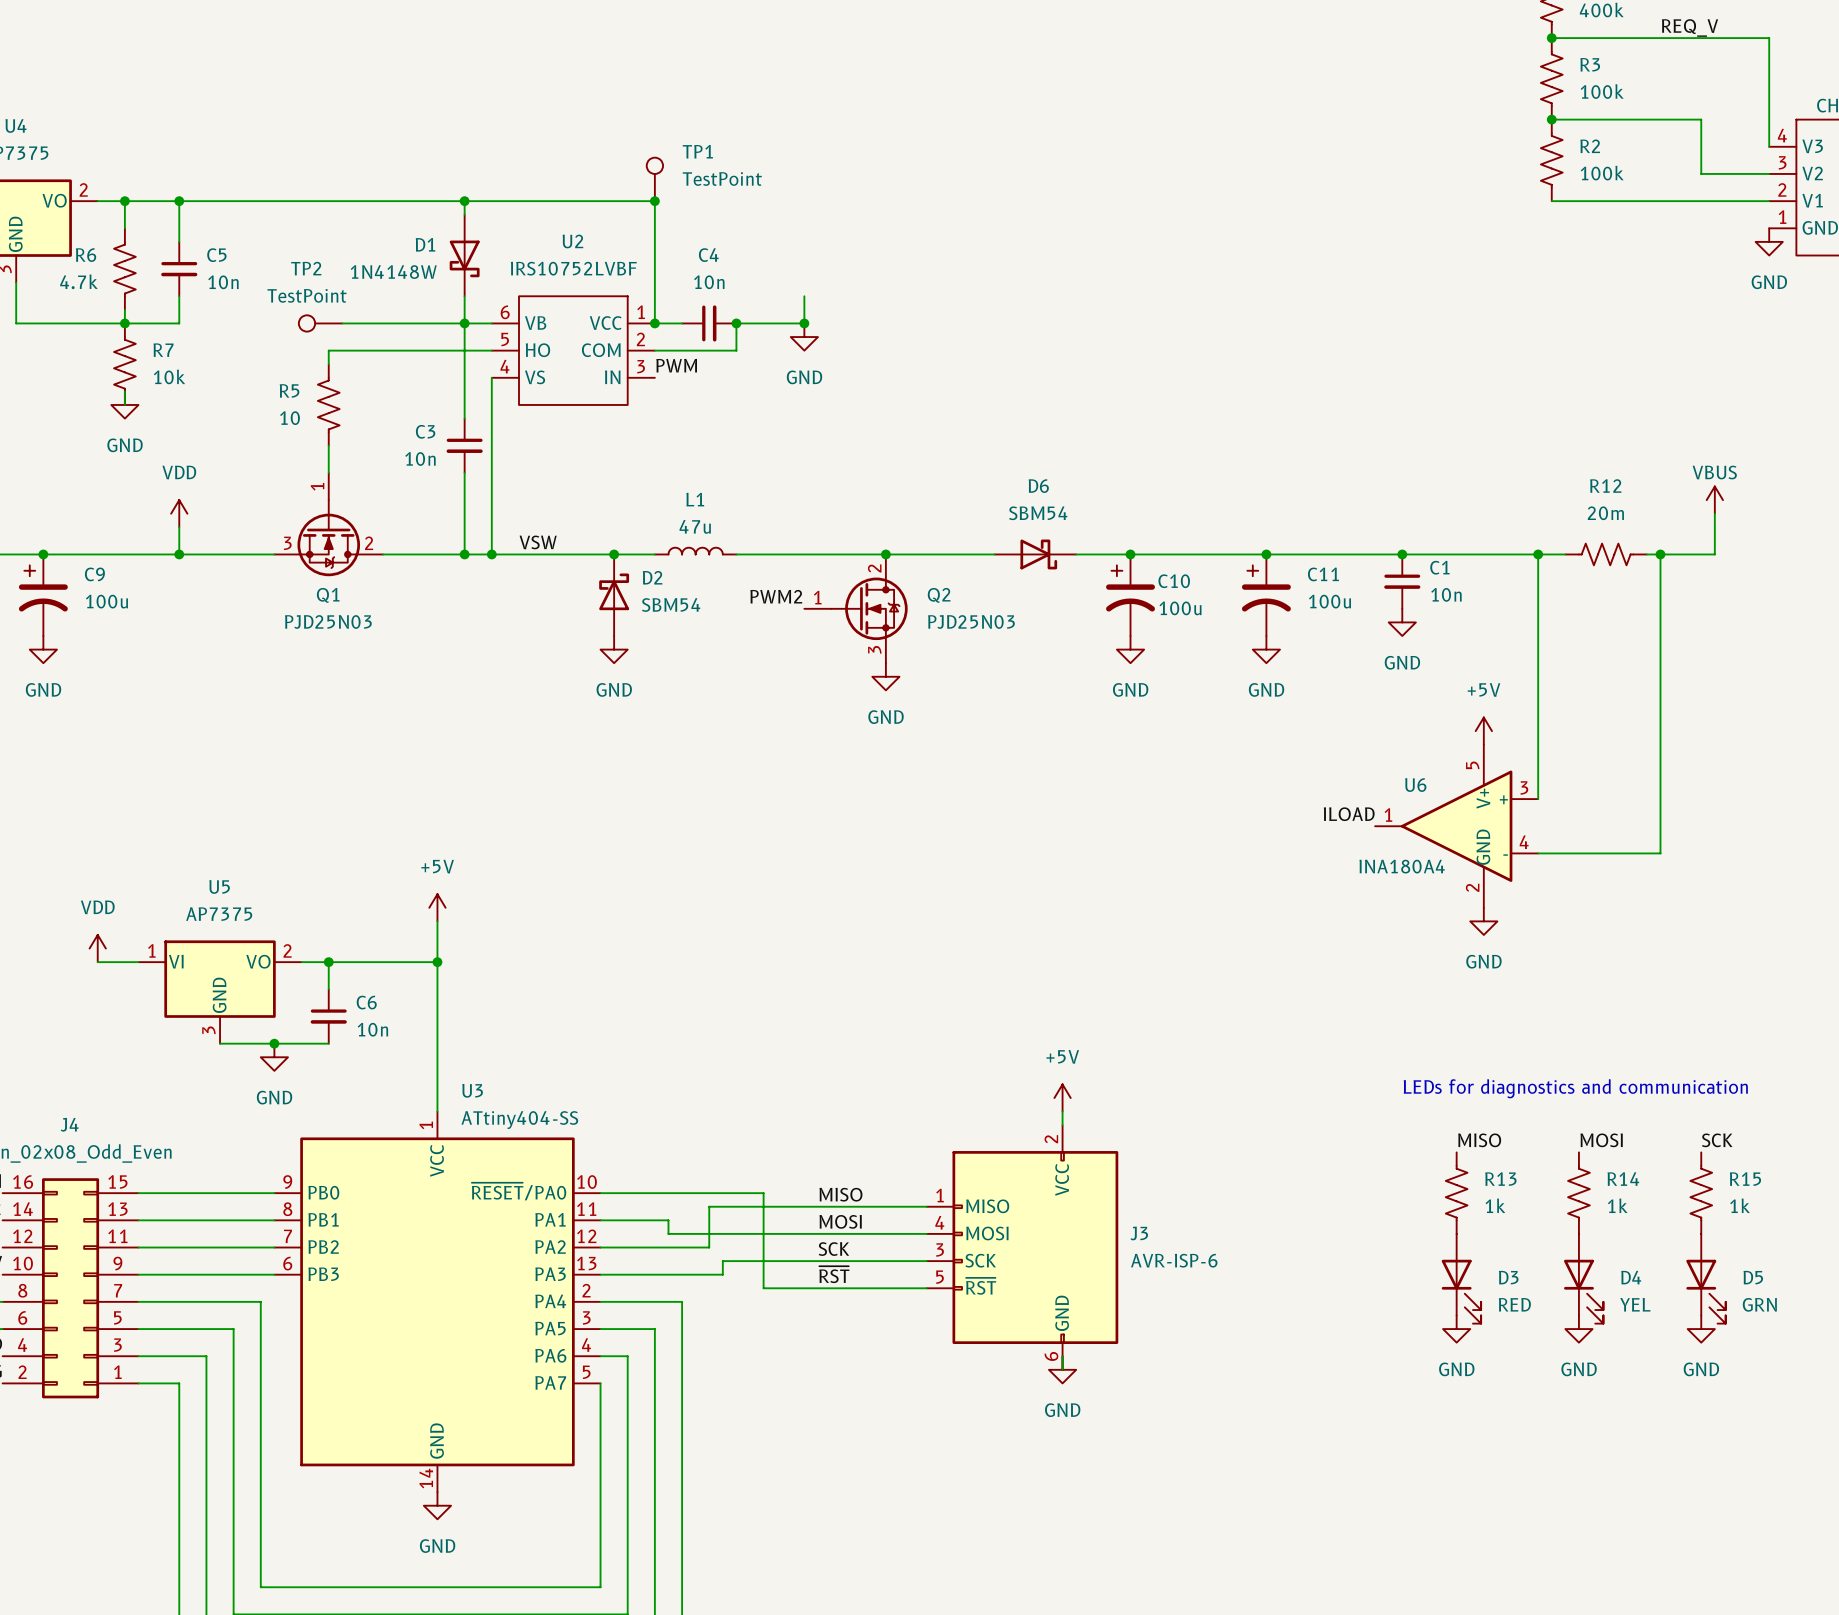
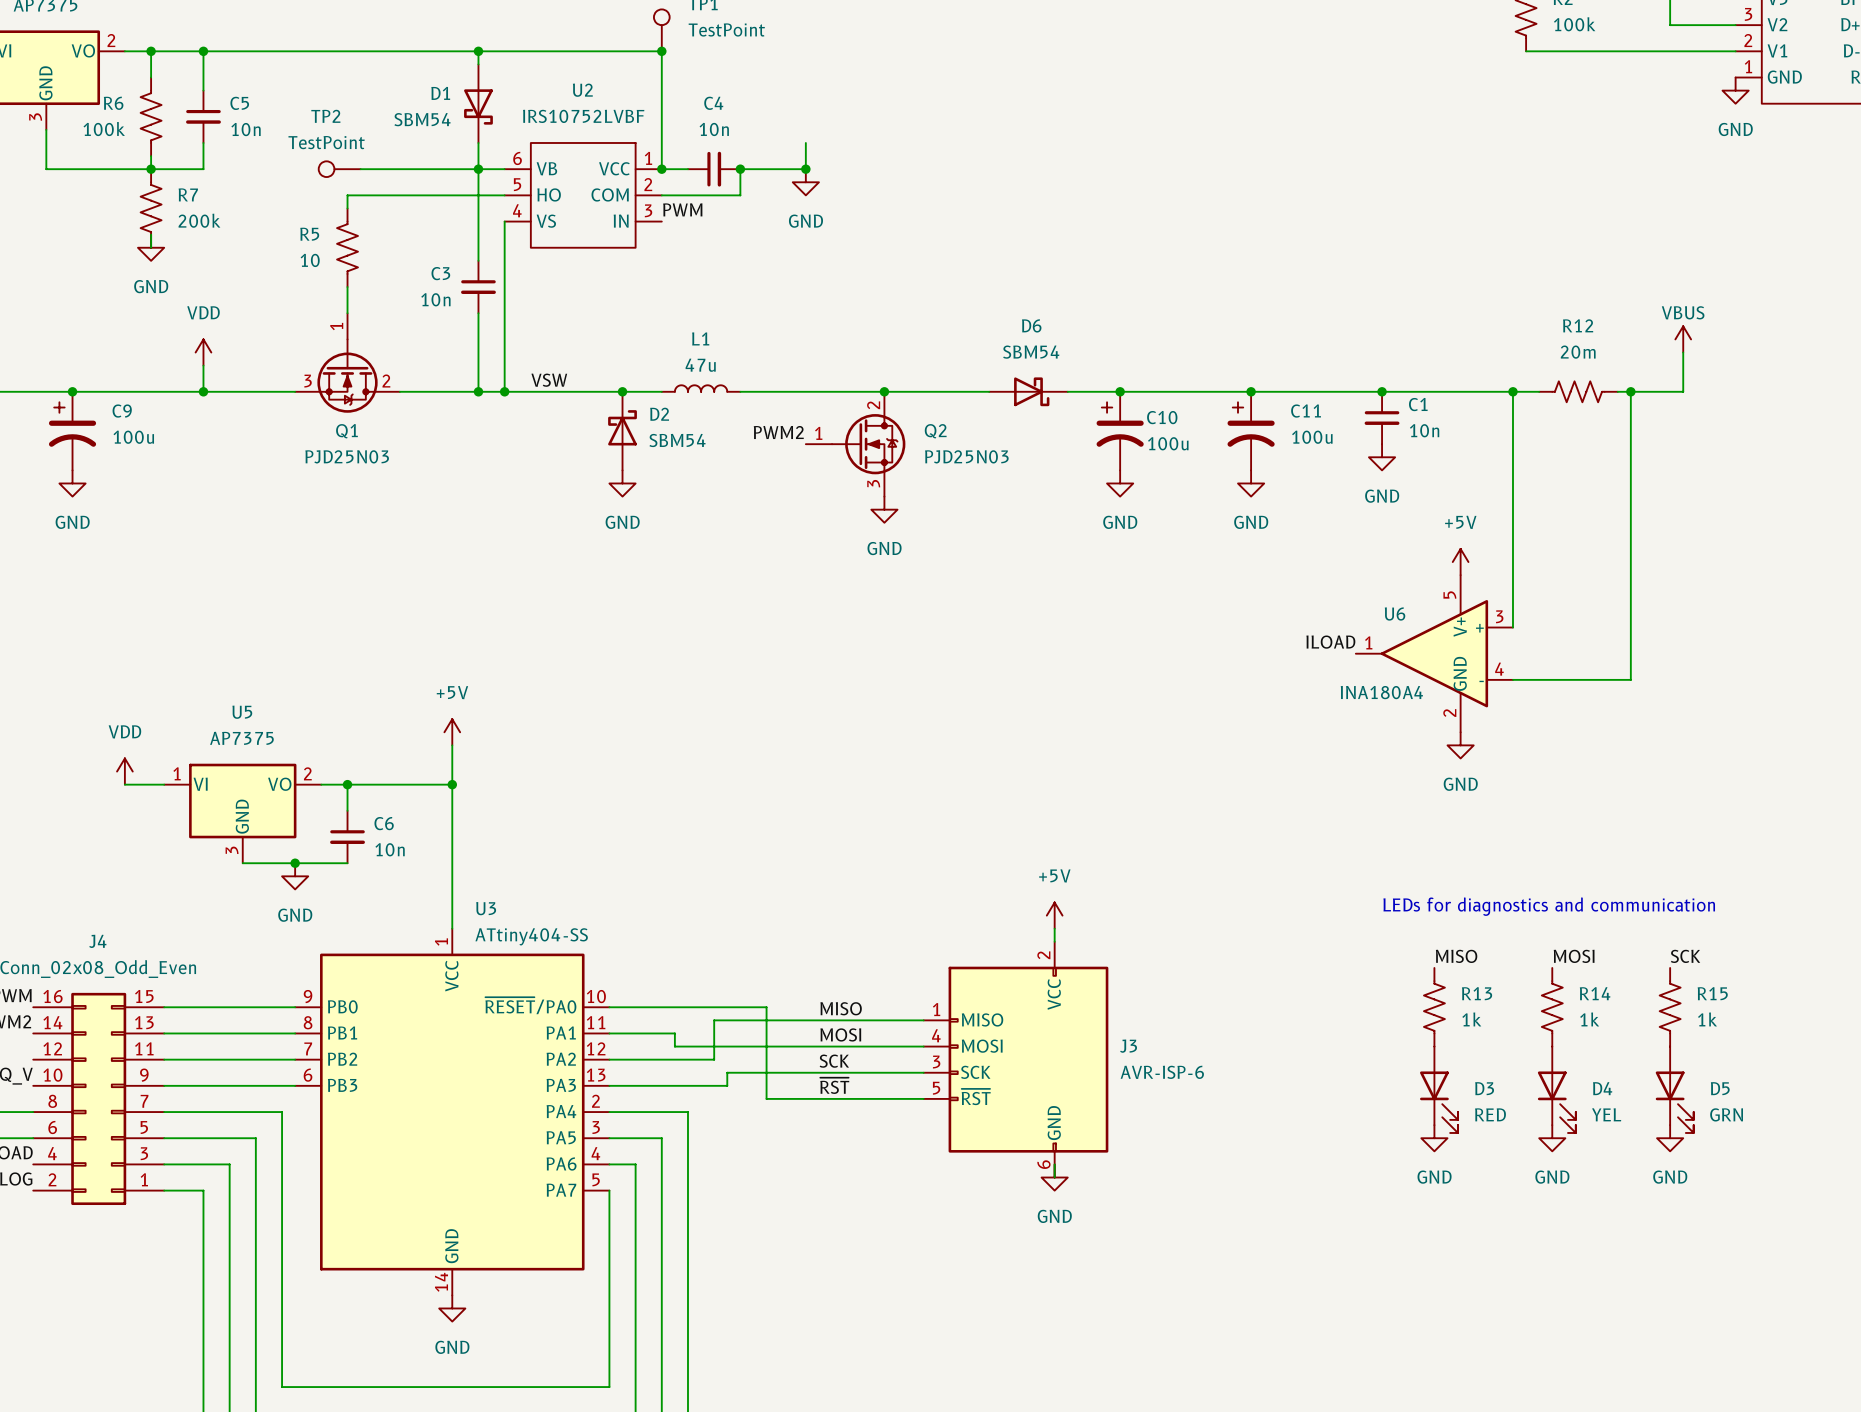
D1 value: 1N4148W (393, 272) -> SBM54 (422, 119)
R6 value: 4.7k (78, 281) -> 100k (104, 129)
R7 value: 10k (169, 376) -> 200k (199, 220)

